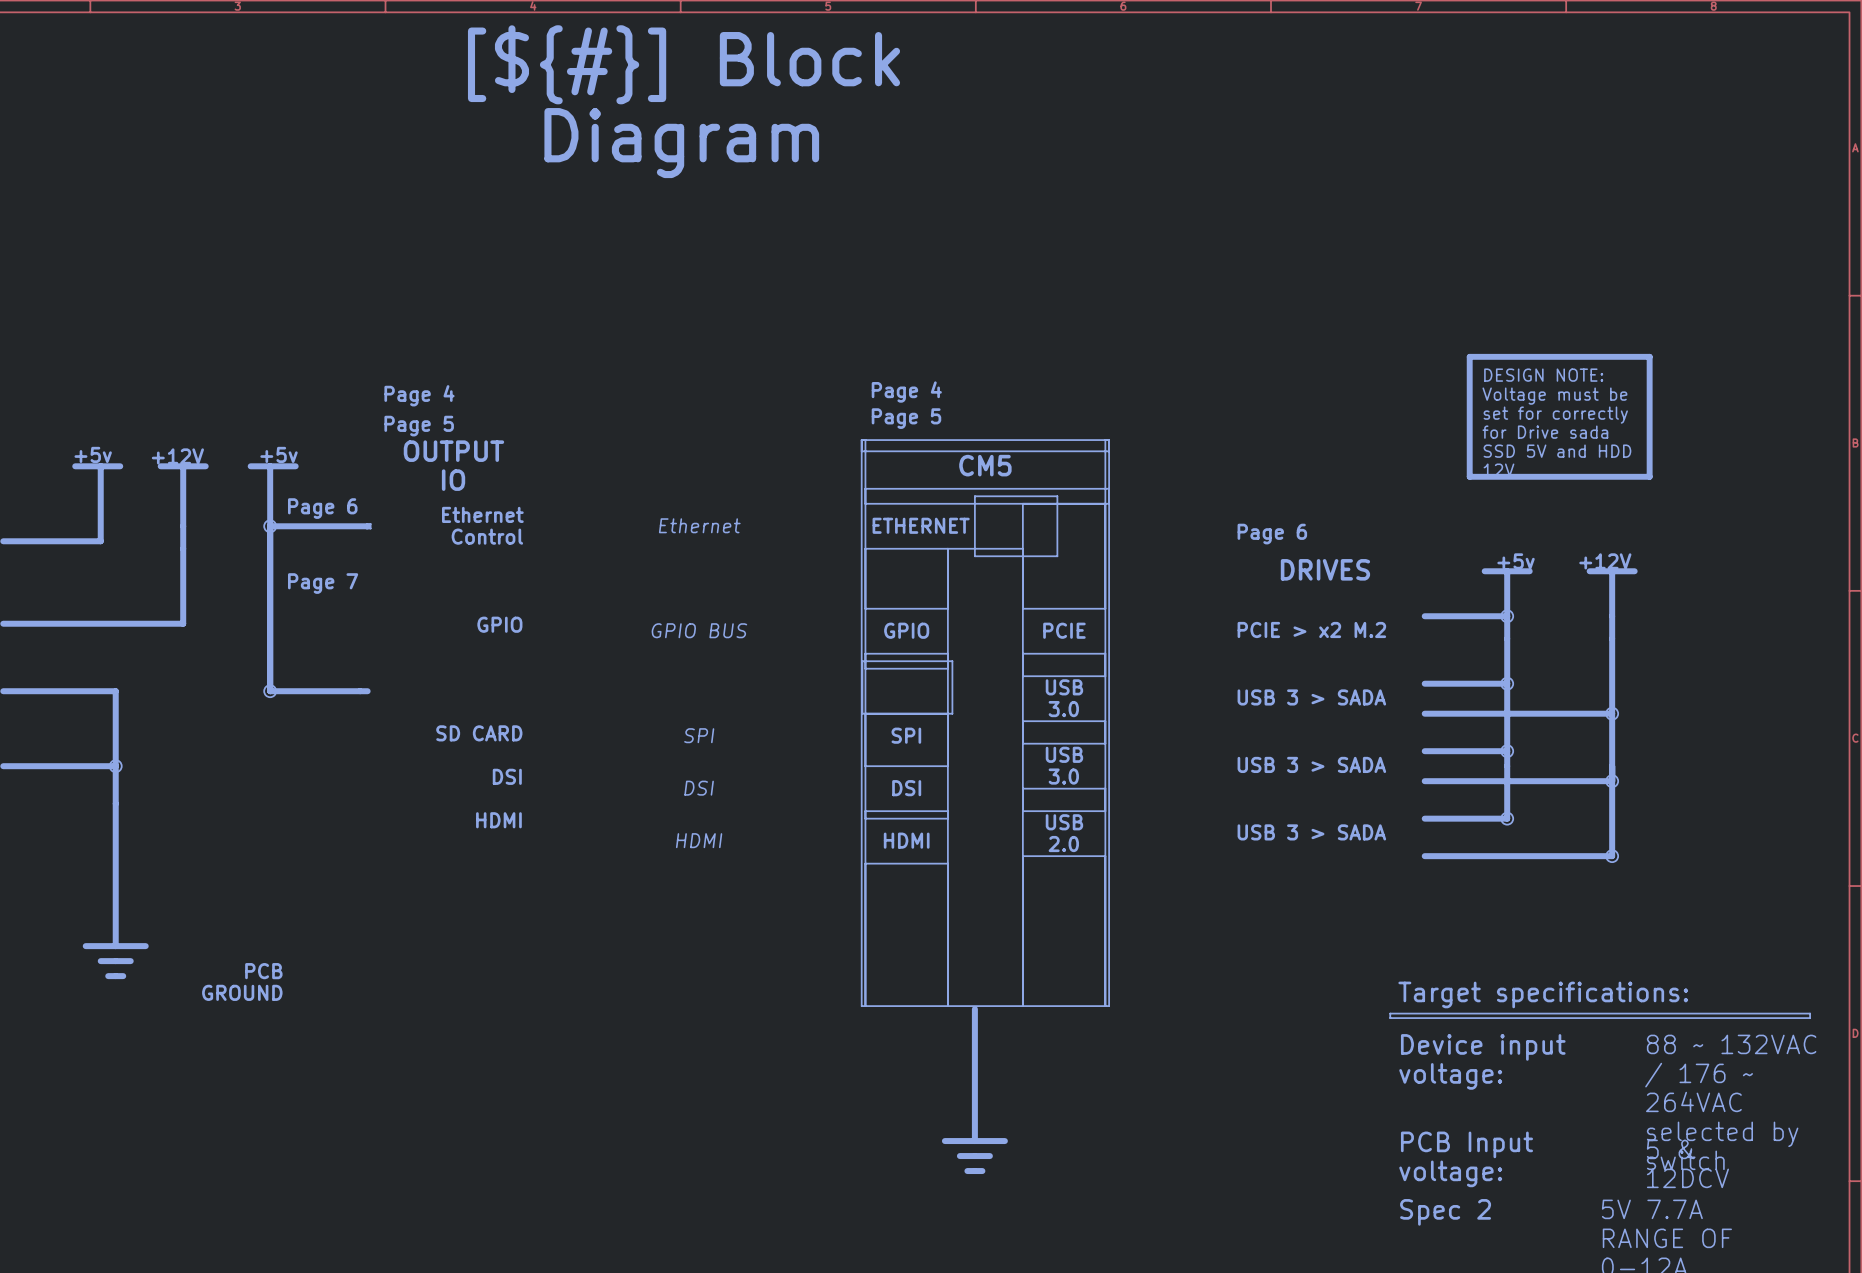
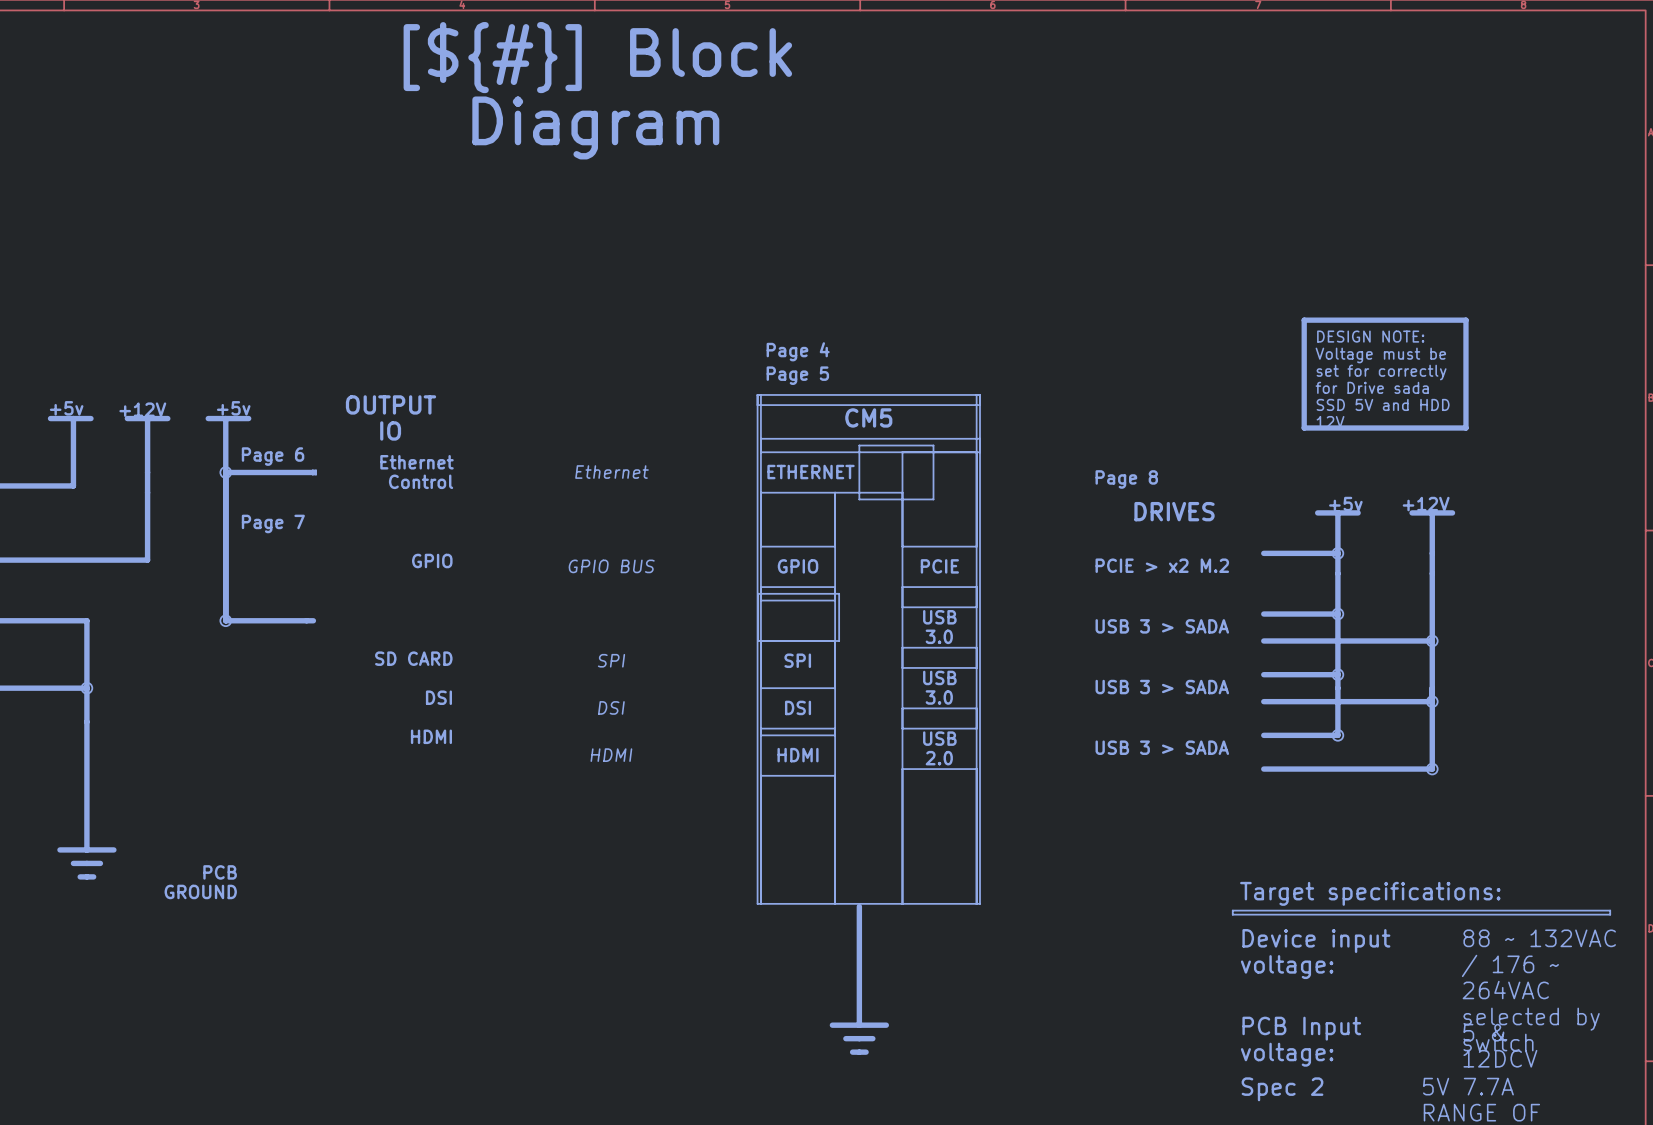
text: Page 4 (419, 395) -> none
text: Page 5 (419, 426) -> none
text: Page 6 (1272, 534) -> Page 8 (1126, 479)

